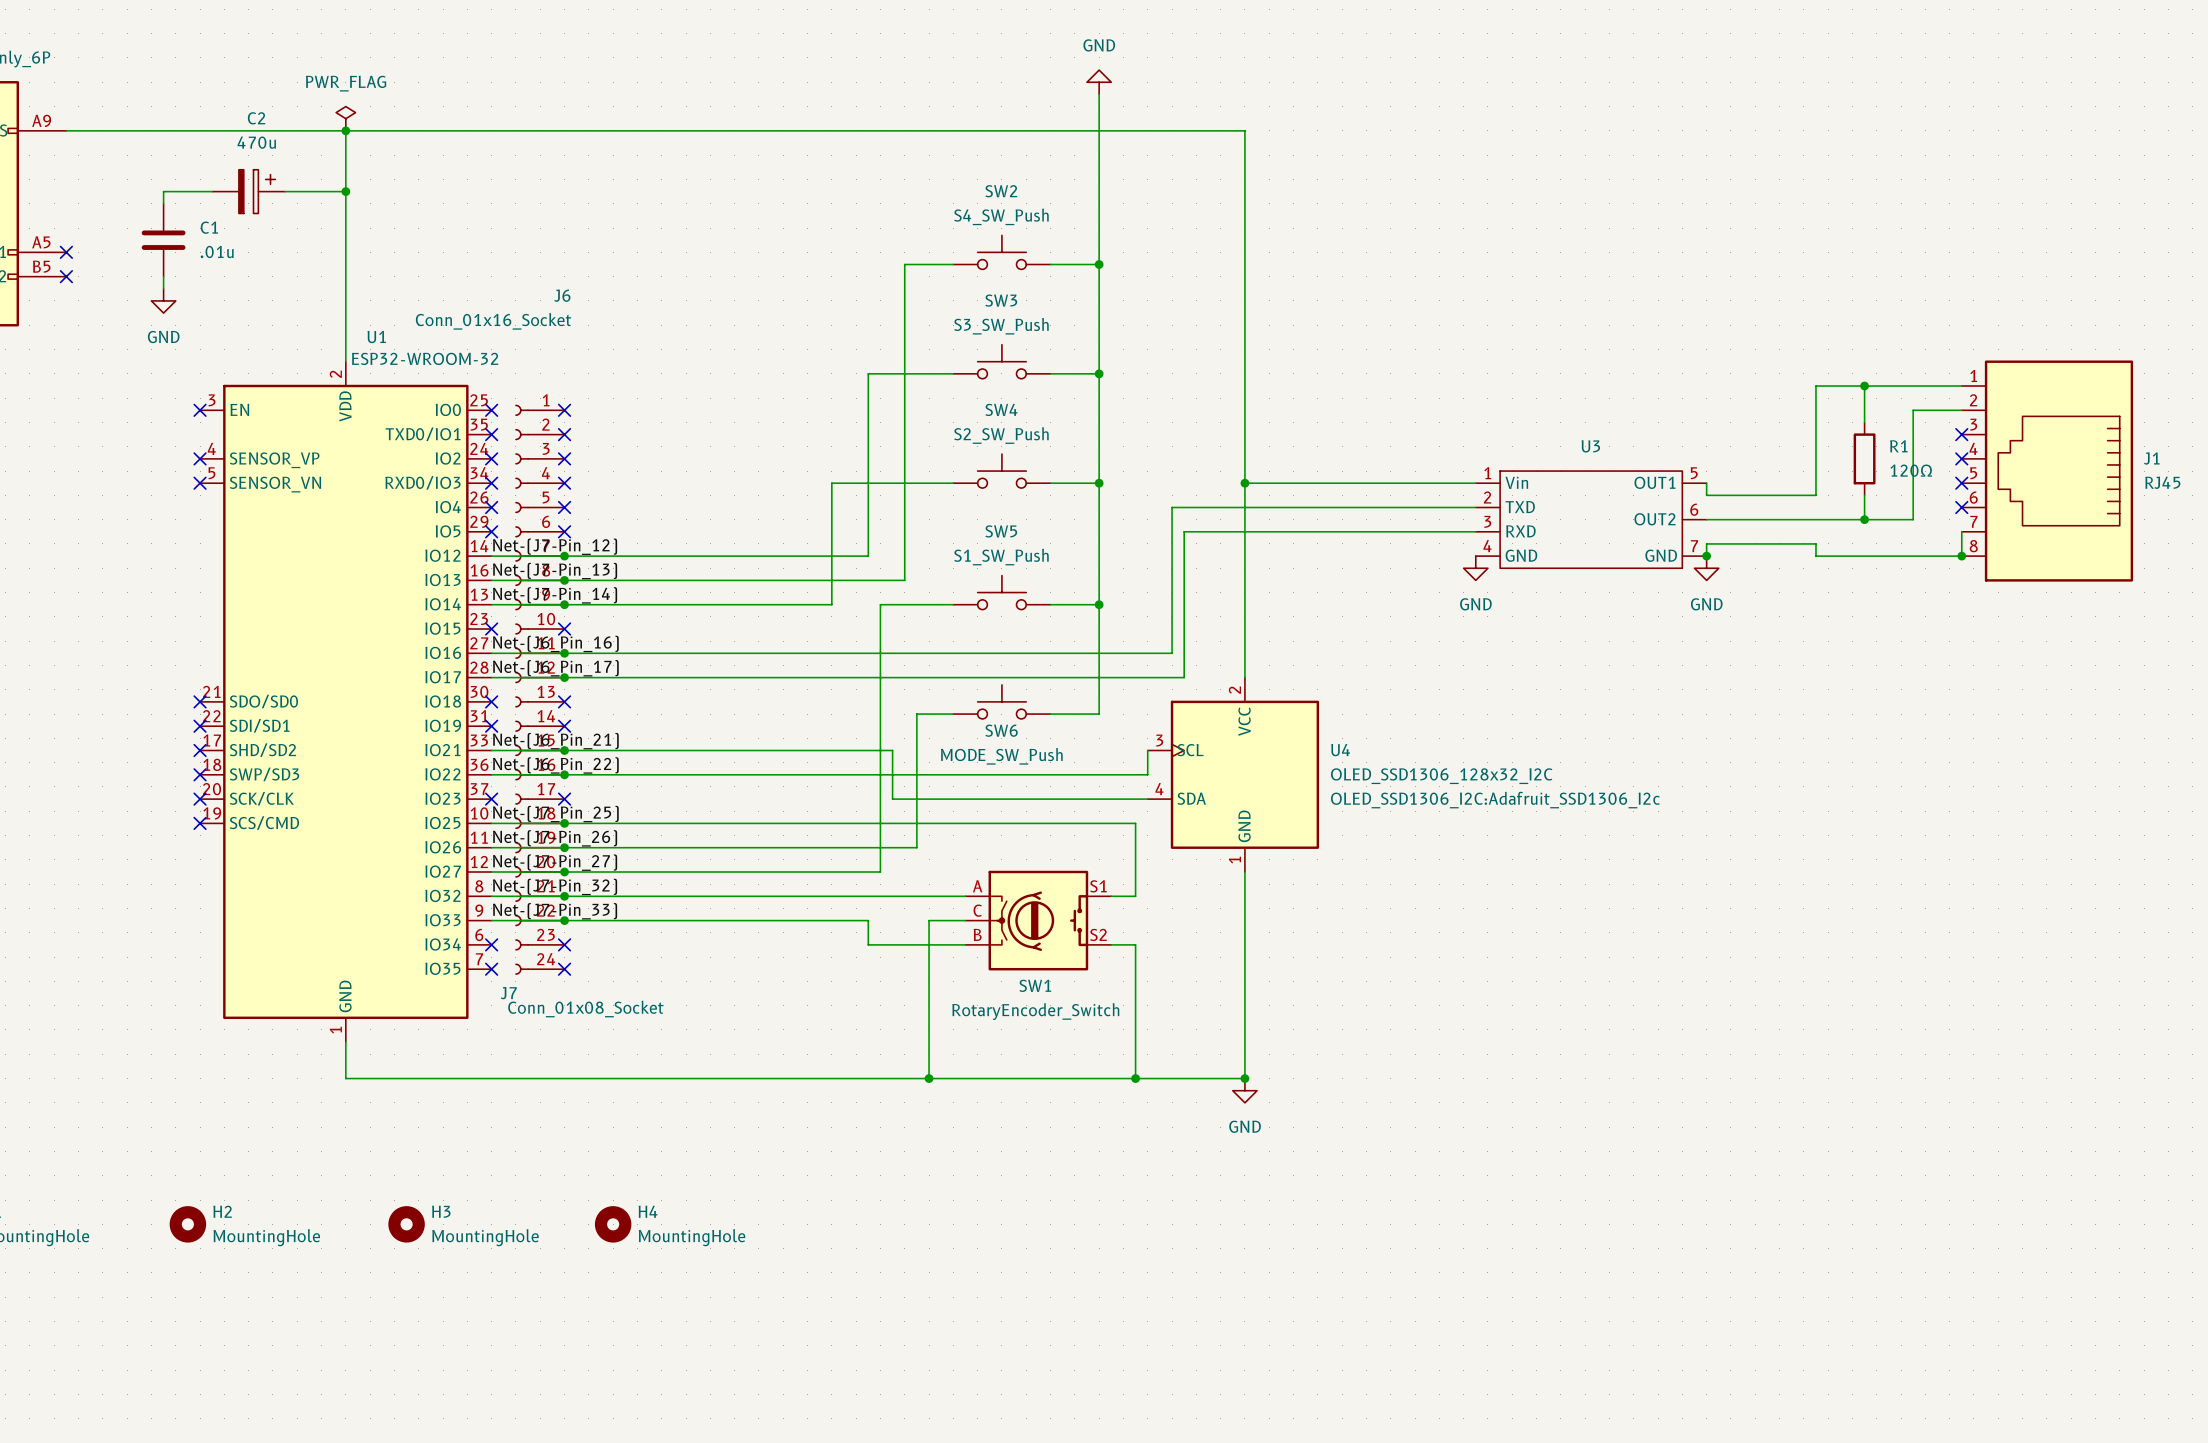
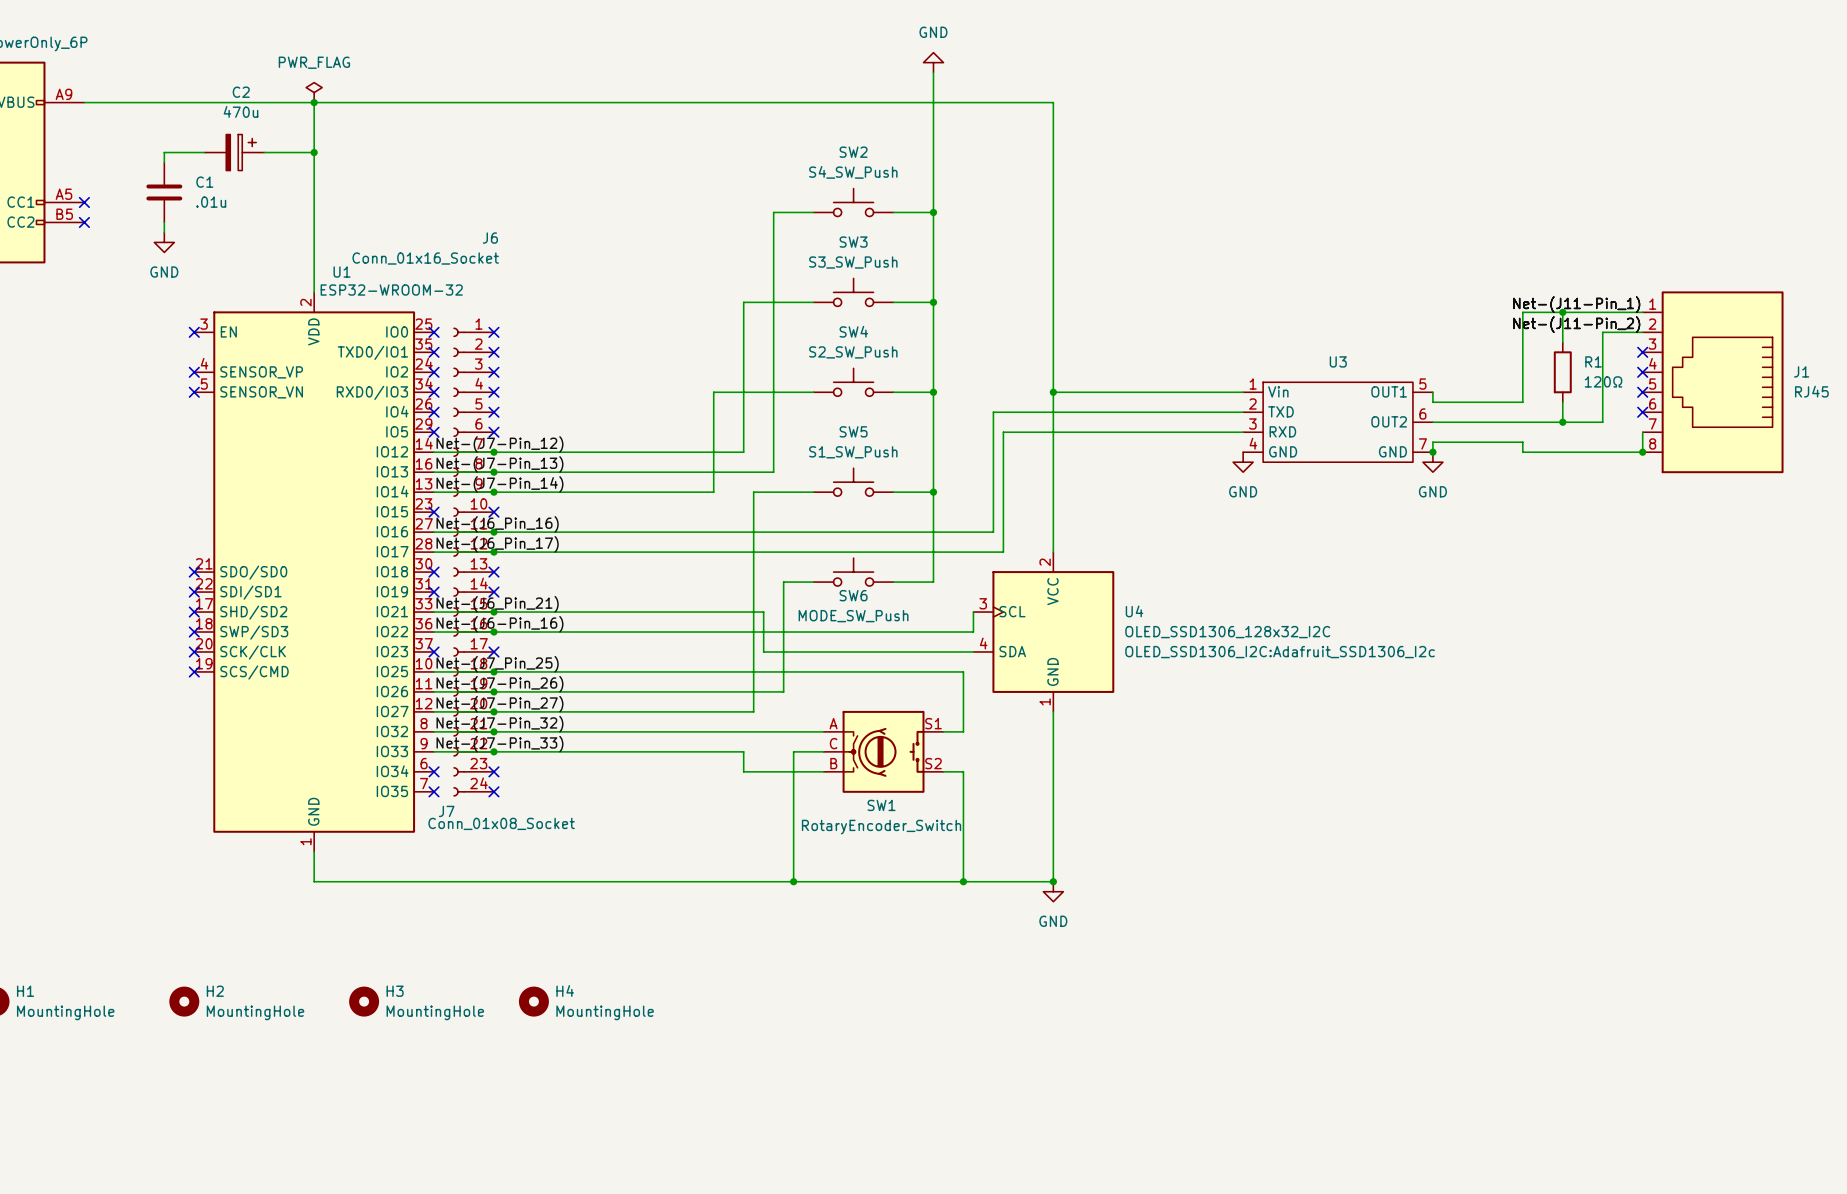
label: none -> Net-(J11-Pin_1) (1576, 304)
label: none -> Net-(J11-Pin_2) (1576, 324)
label: Net-(J6_Pin_22) (555, 765) -> Net-(J6-Pin_16) (499, 624)

